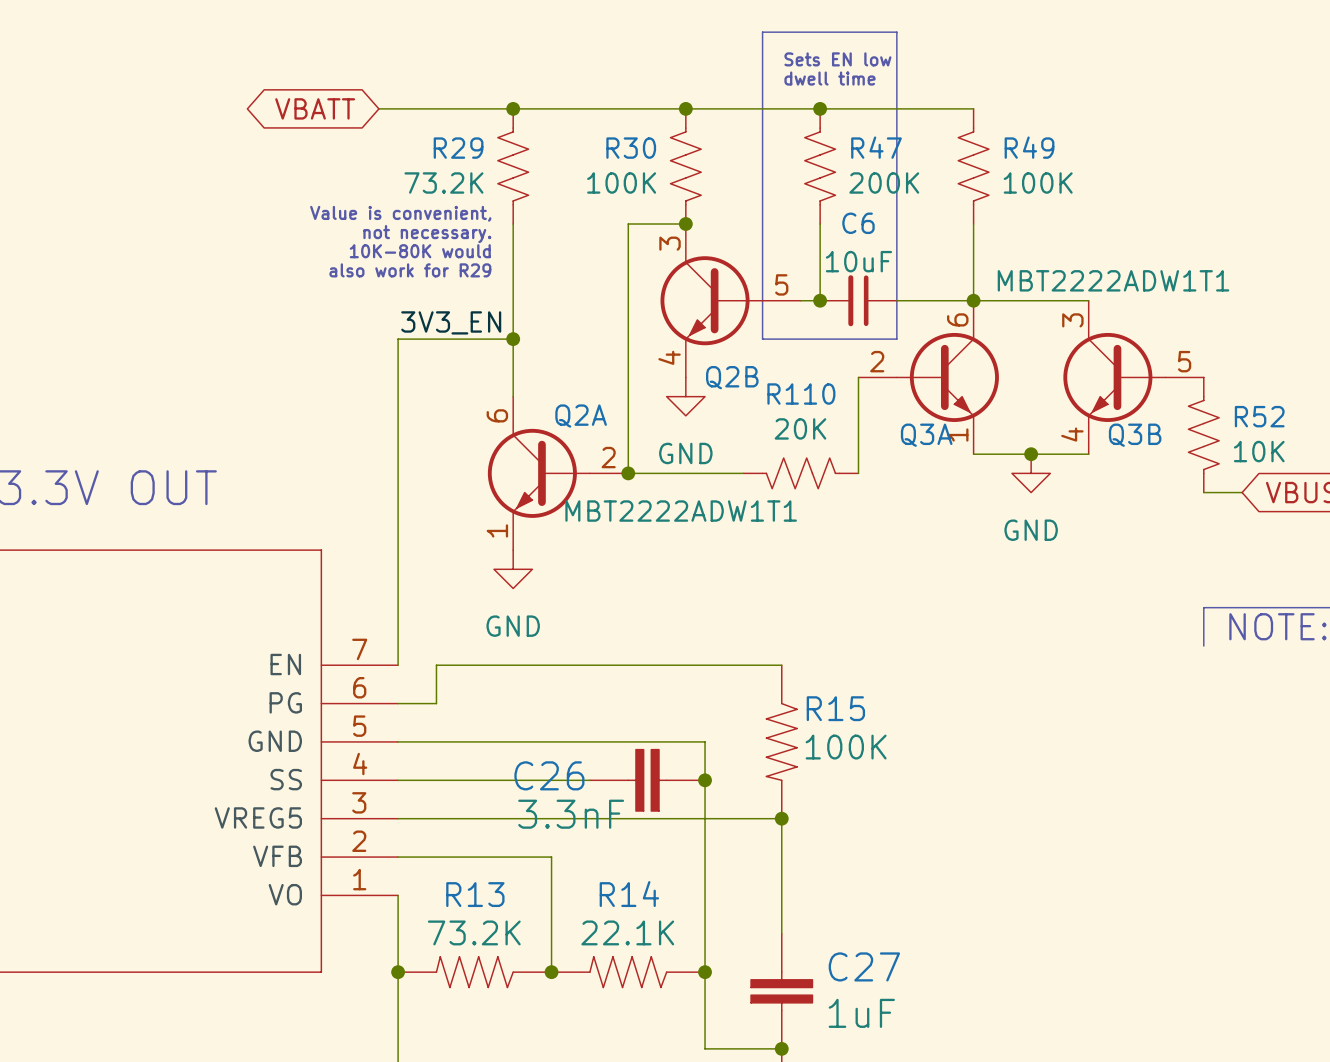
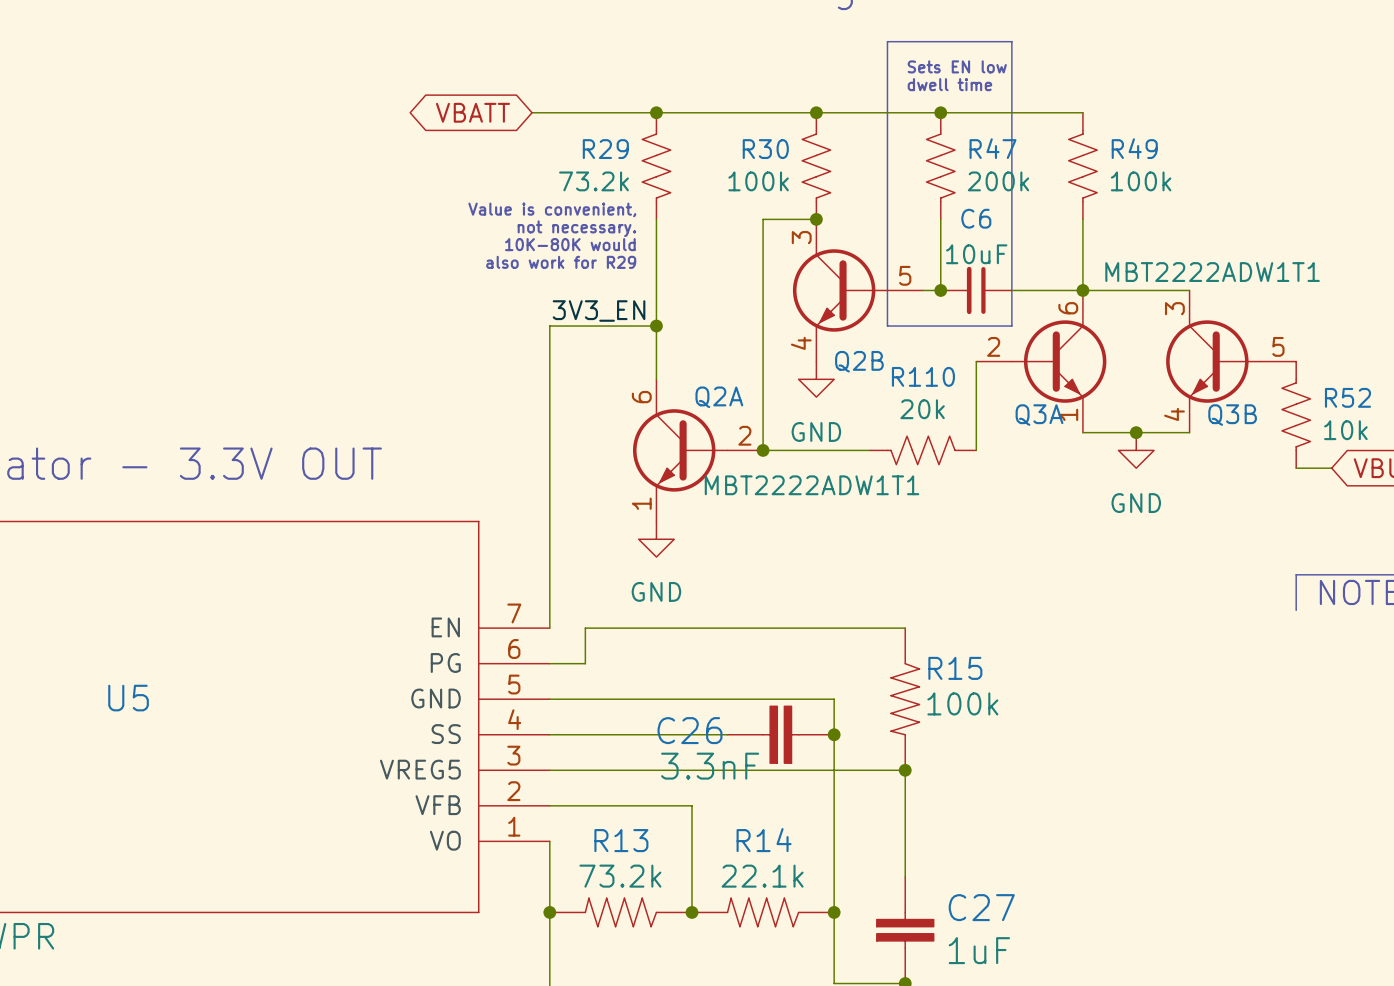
R29 value: 73.2K (443, 183) -> 73.2k (593, 181)
R30 value: 100K (621, 183) -> 100k (758, 181)
R47 value: 200K (884, 183) -> 200k (998, 181)
R49 value: 100K (1038, 183) -> 100k (1141, 181)
R110 value: 20K (800, 428) -> 20k (922, 409)
R52 value: 10K (1259, 451) -> 10k (1345, 430)
R15 value: 100K (846, 747) -> 100k (962, 703)
R13 value: 73.2K (474, 932) -> 73.2k (620, 876)
R14 value: 22.1K (627, 932) -> 22.1k (762, 876)

